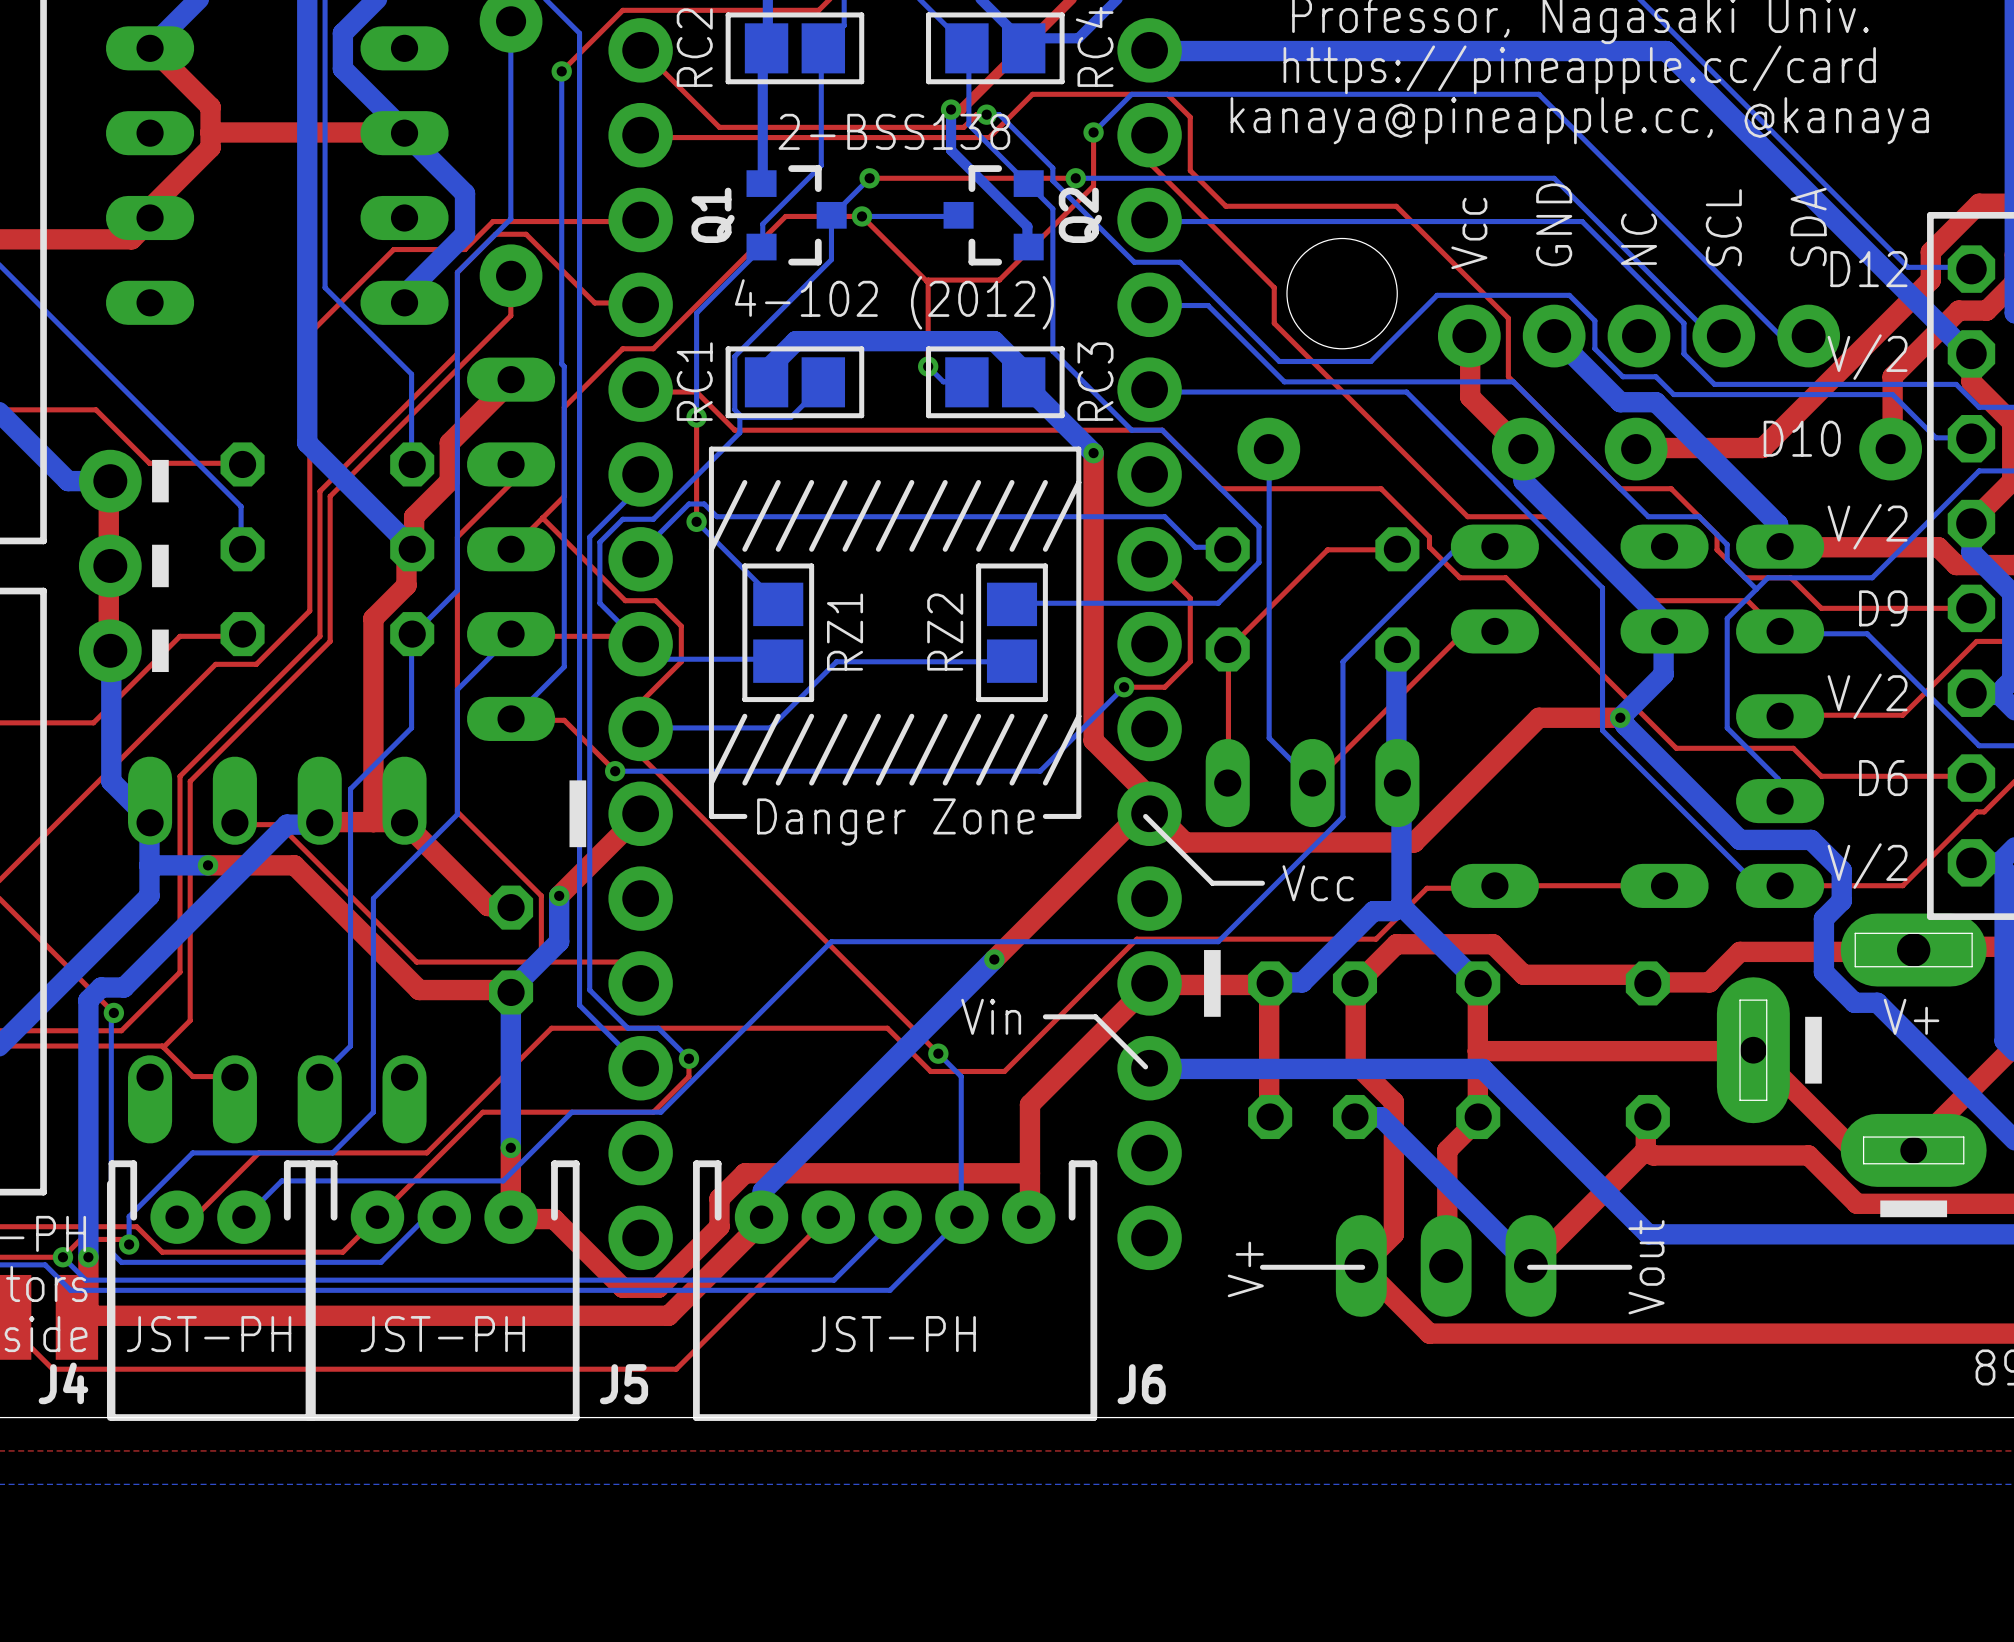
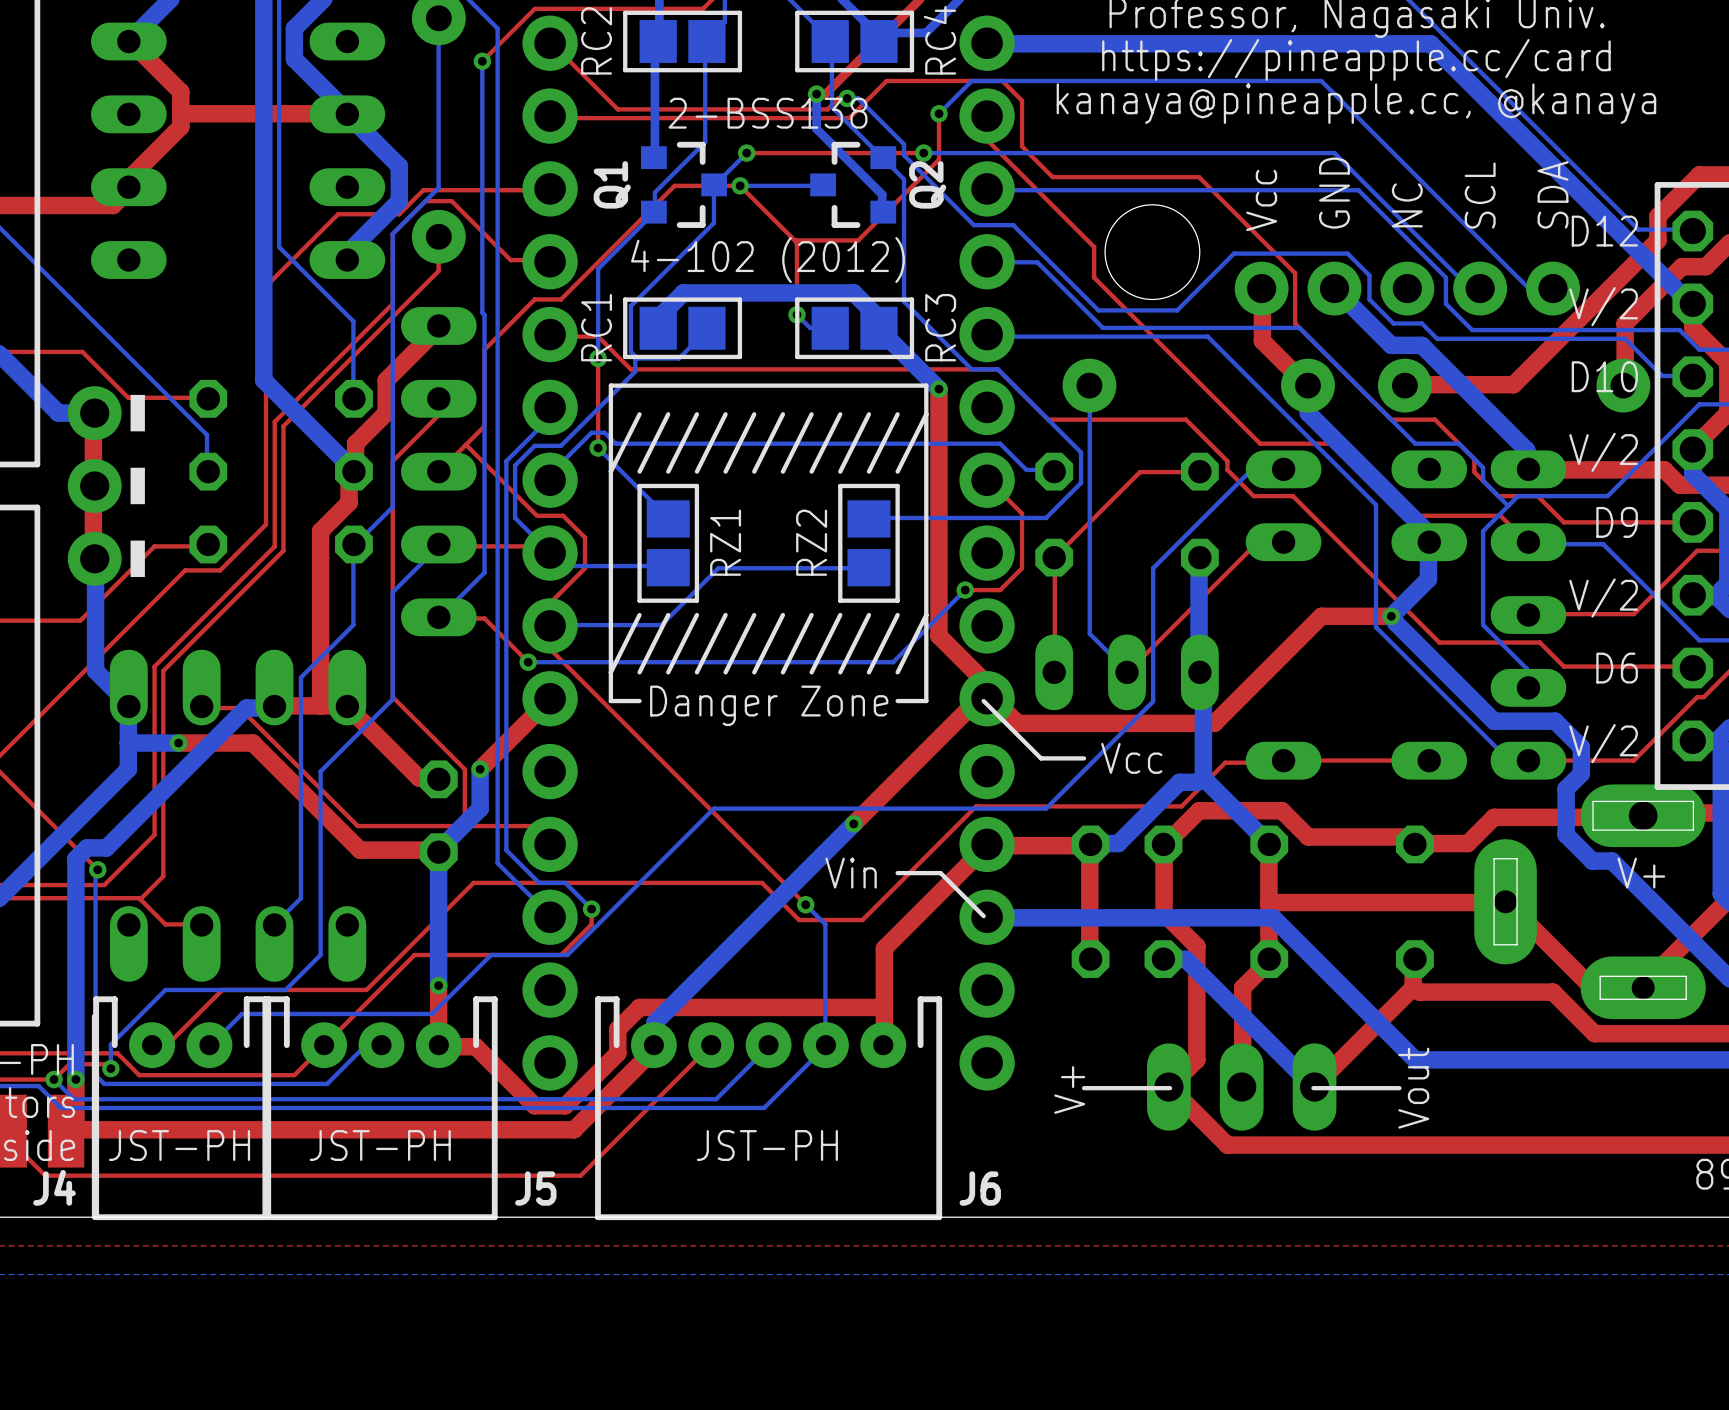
text position: D10 (1802, 438) -> D10 (1604, 376)
drawing: [569, 780, 587, 848] -> none
drawing: [1204, 950, 1221, 1017] -> none
drawing: [1805, 1016, 1822, 1084] -> none
drawing: [1880, 1200, 1948, 1218] -> none

